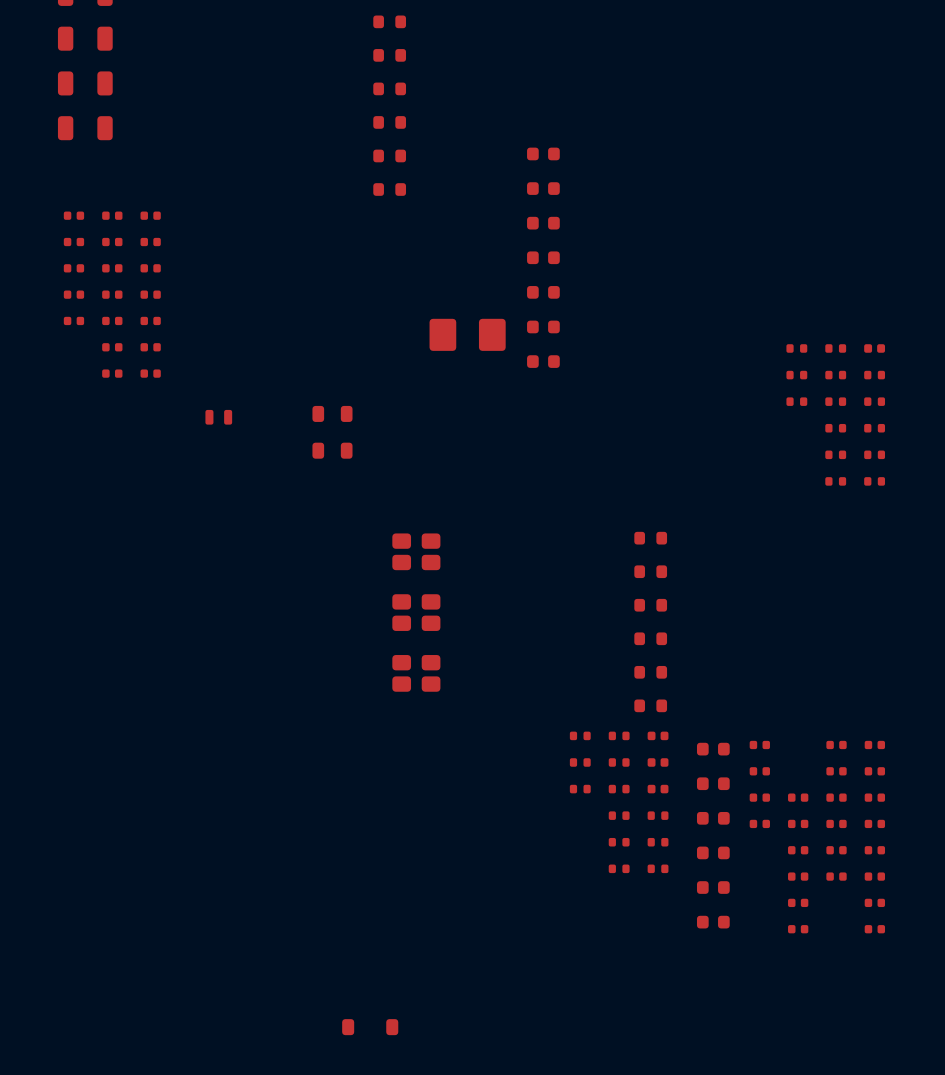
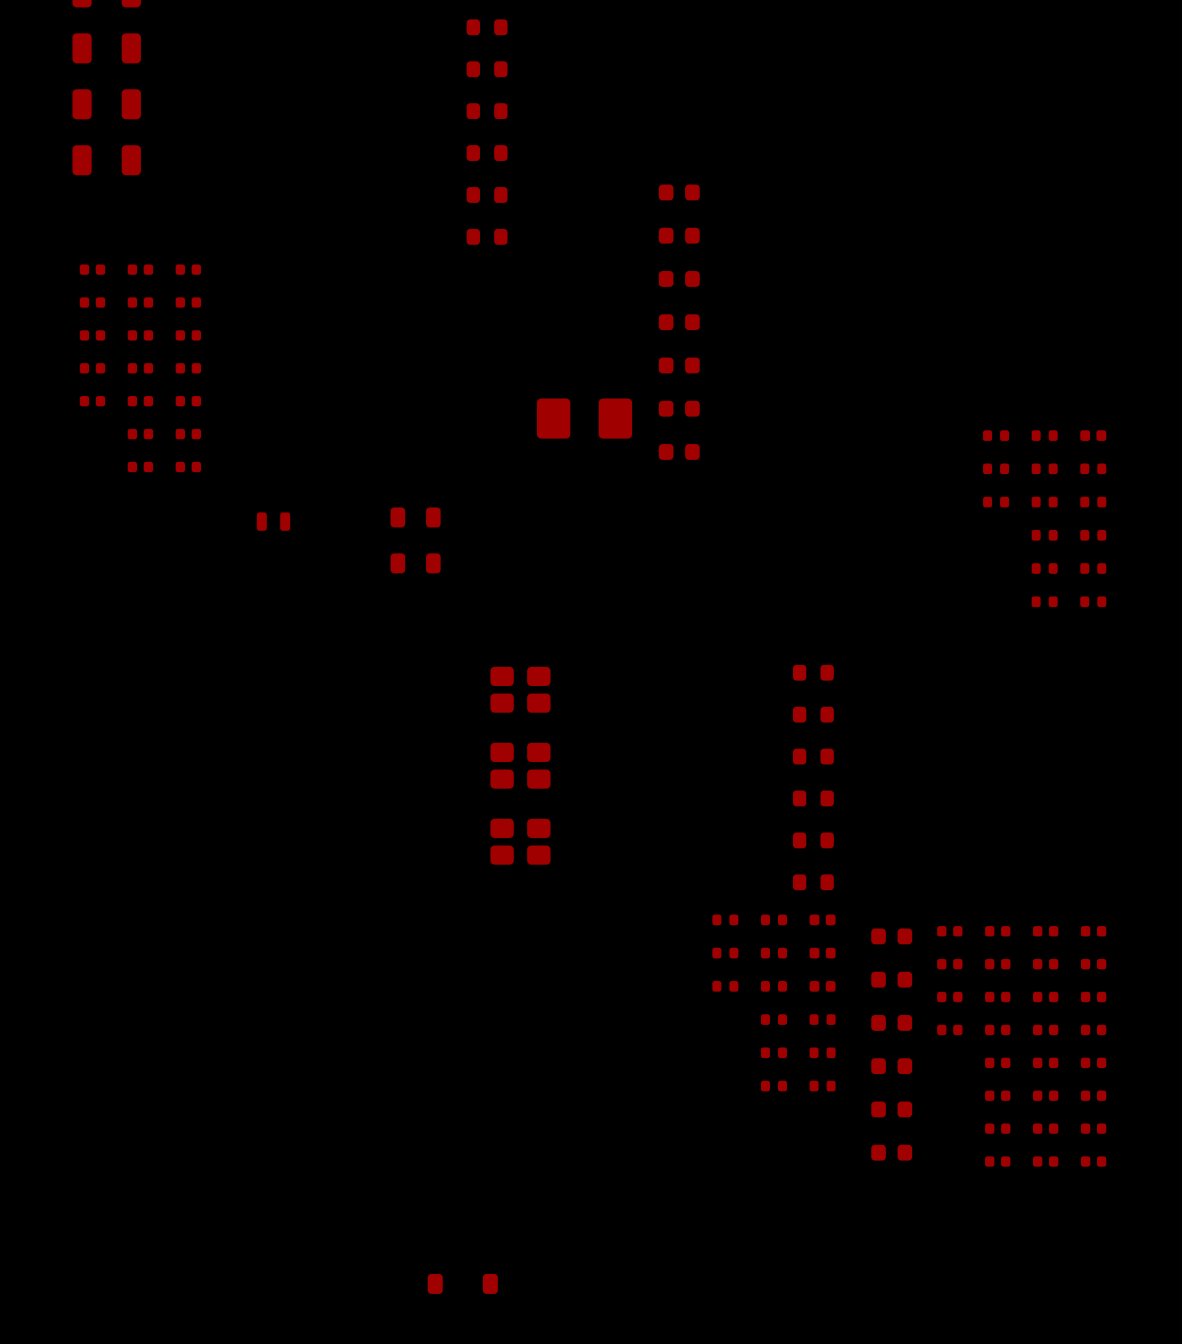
part: none -> (997, 931)
part: none -> (997, 964)
part: none -> (1045, 1128)
part: none -> (1045, 1161)

